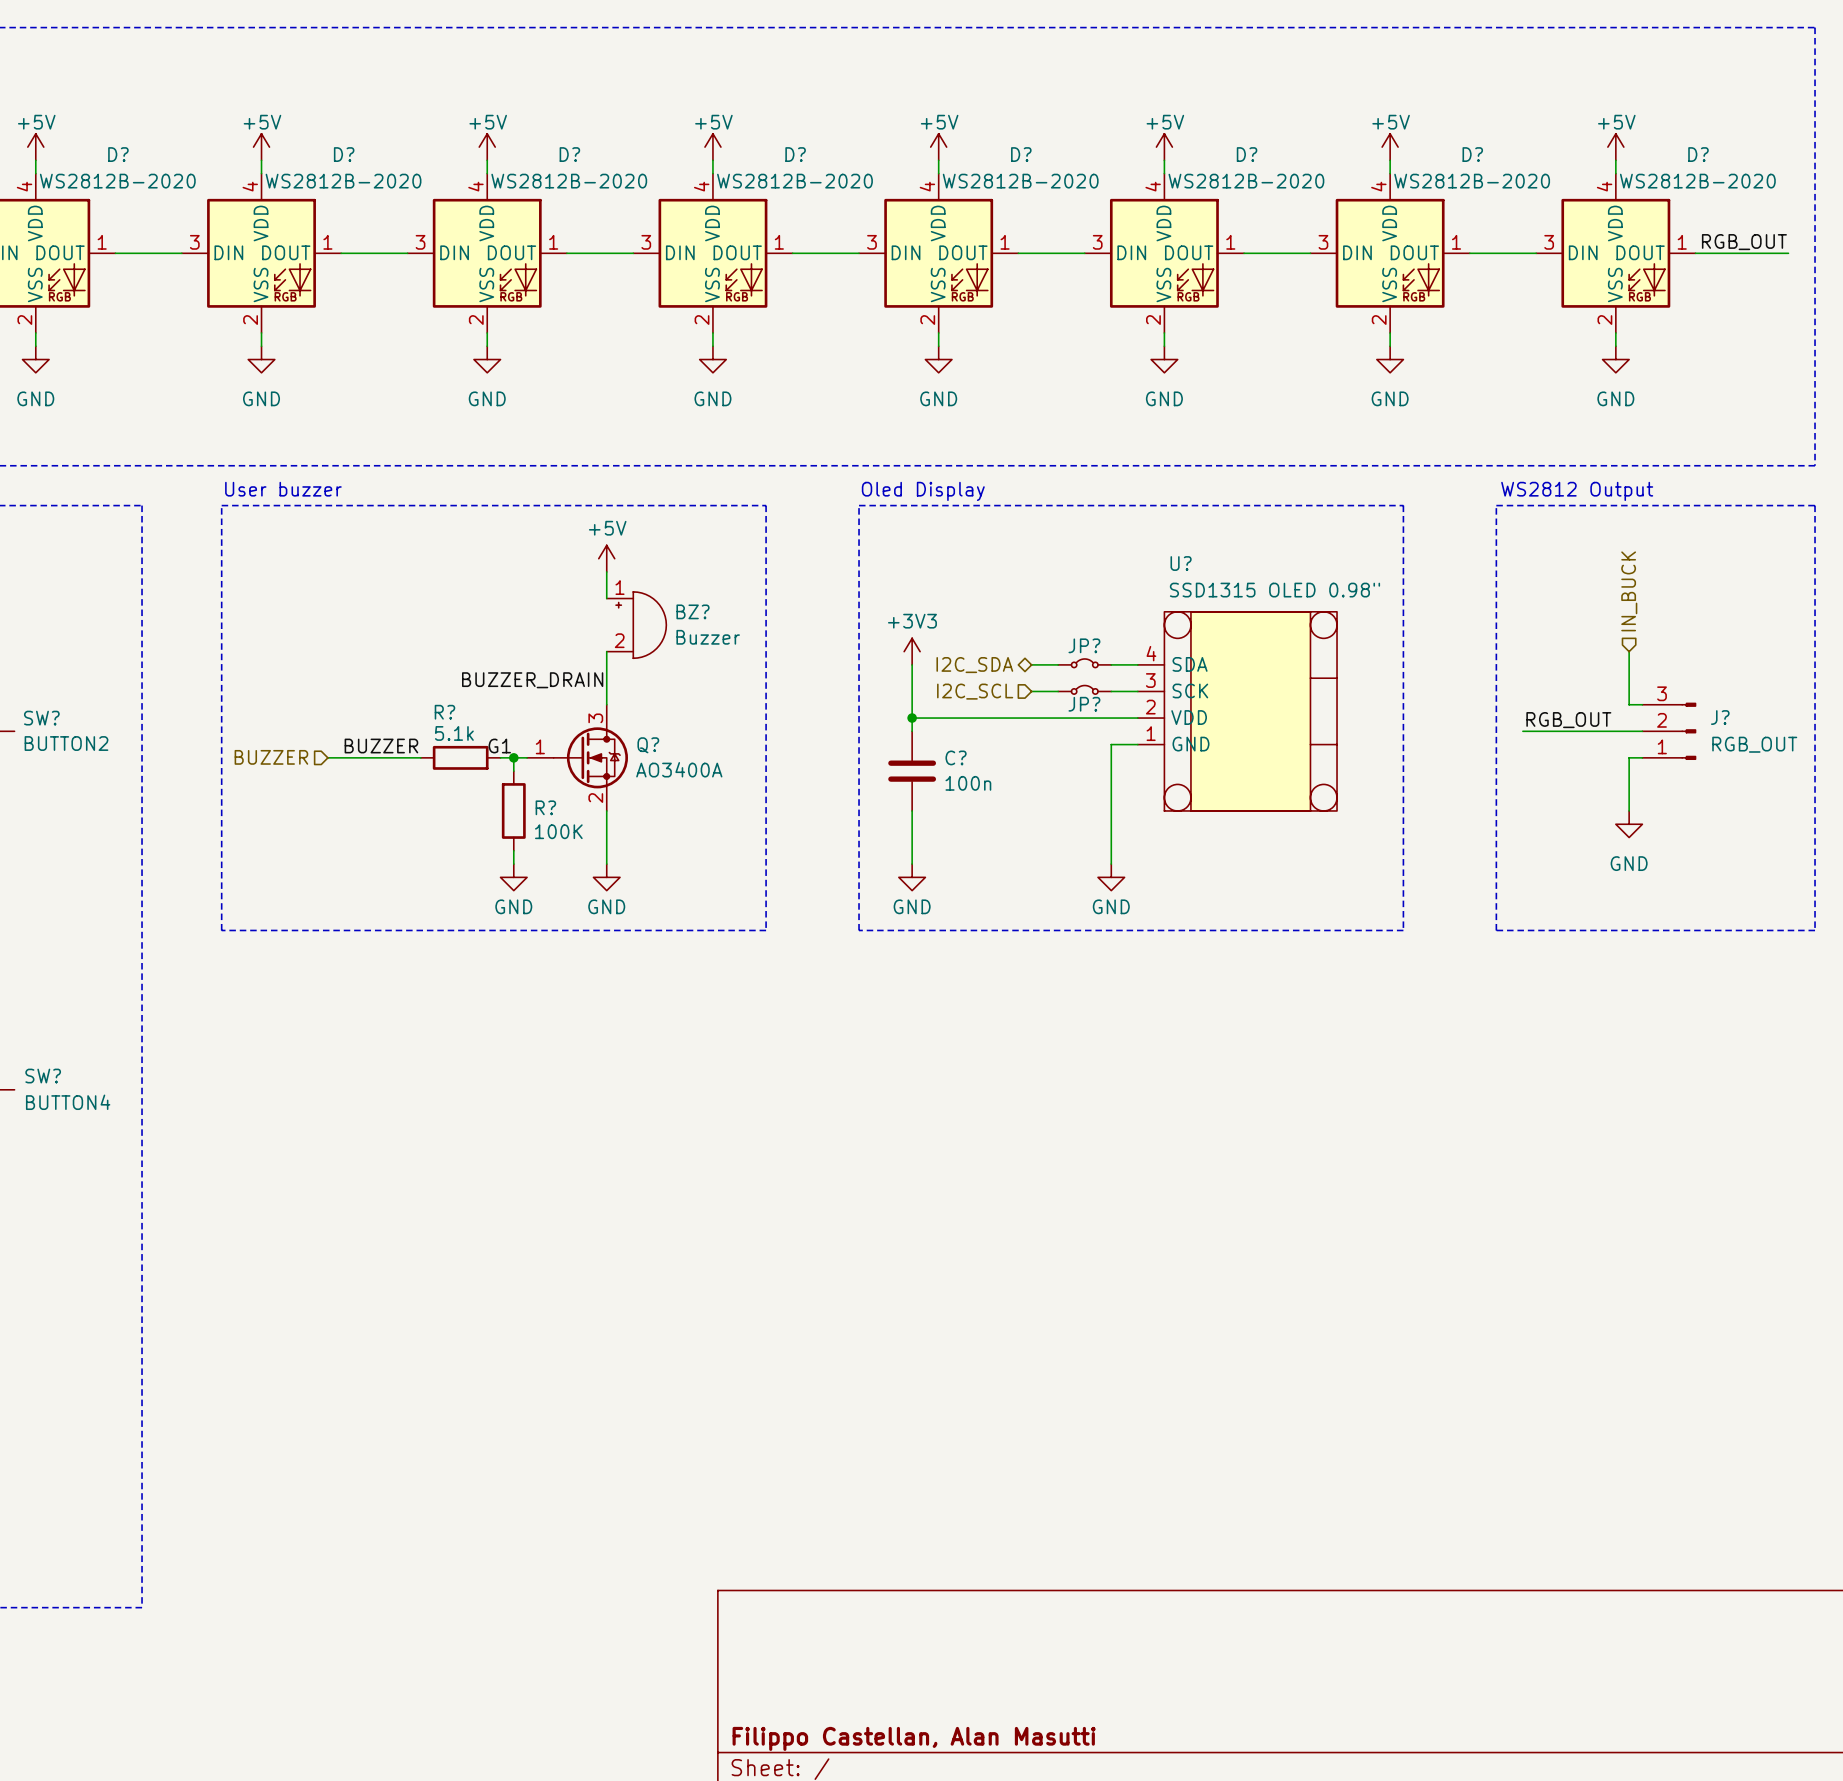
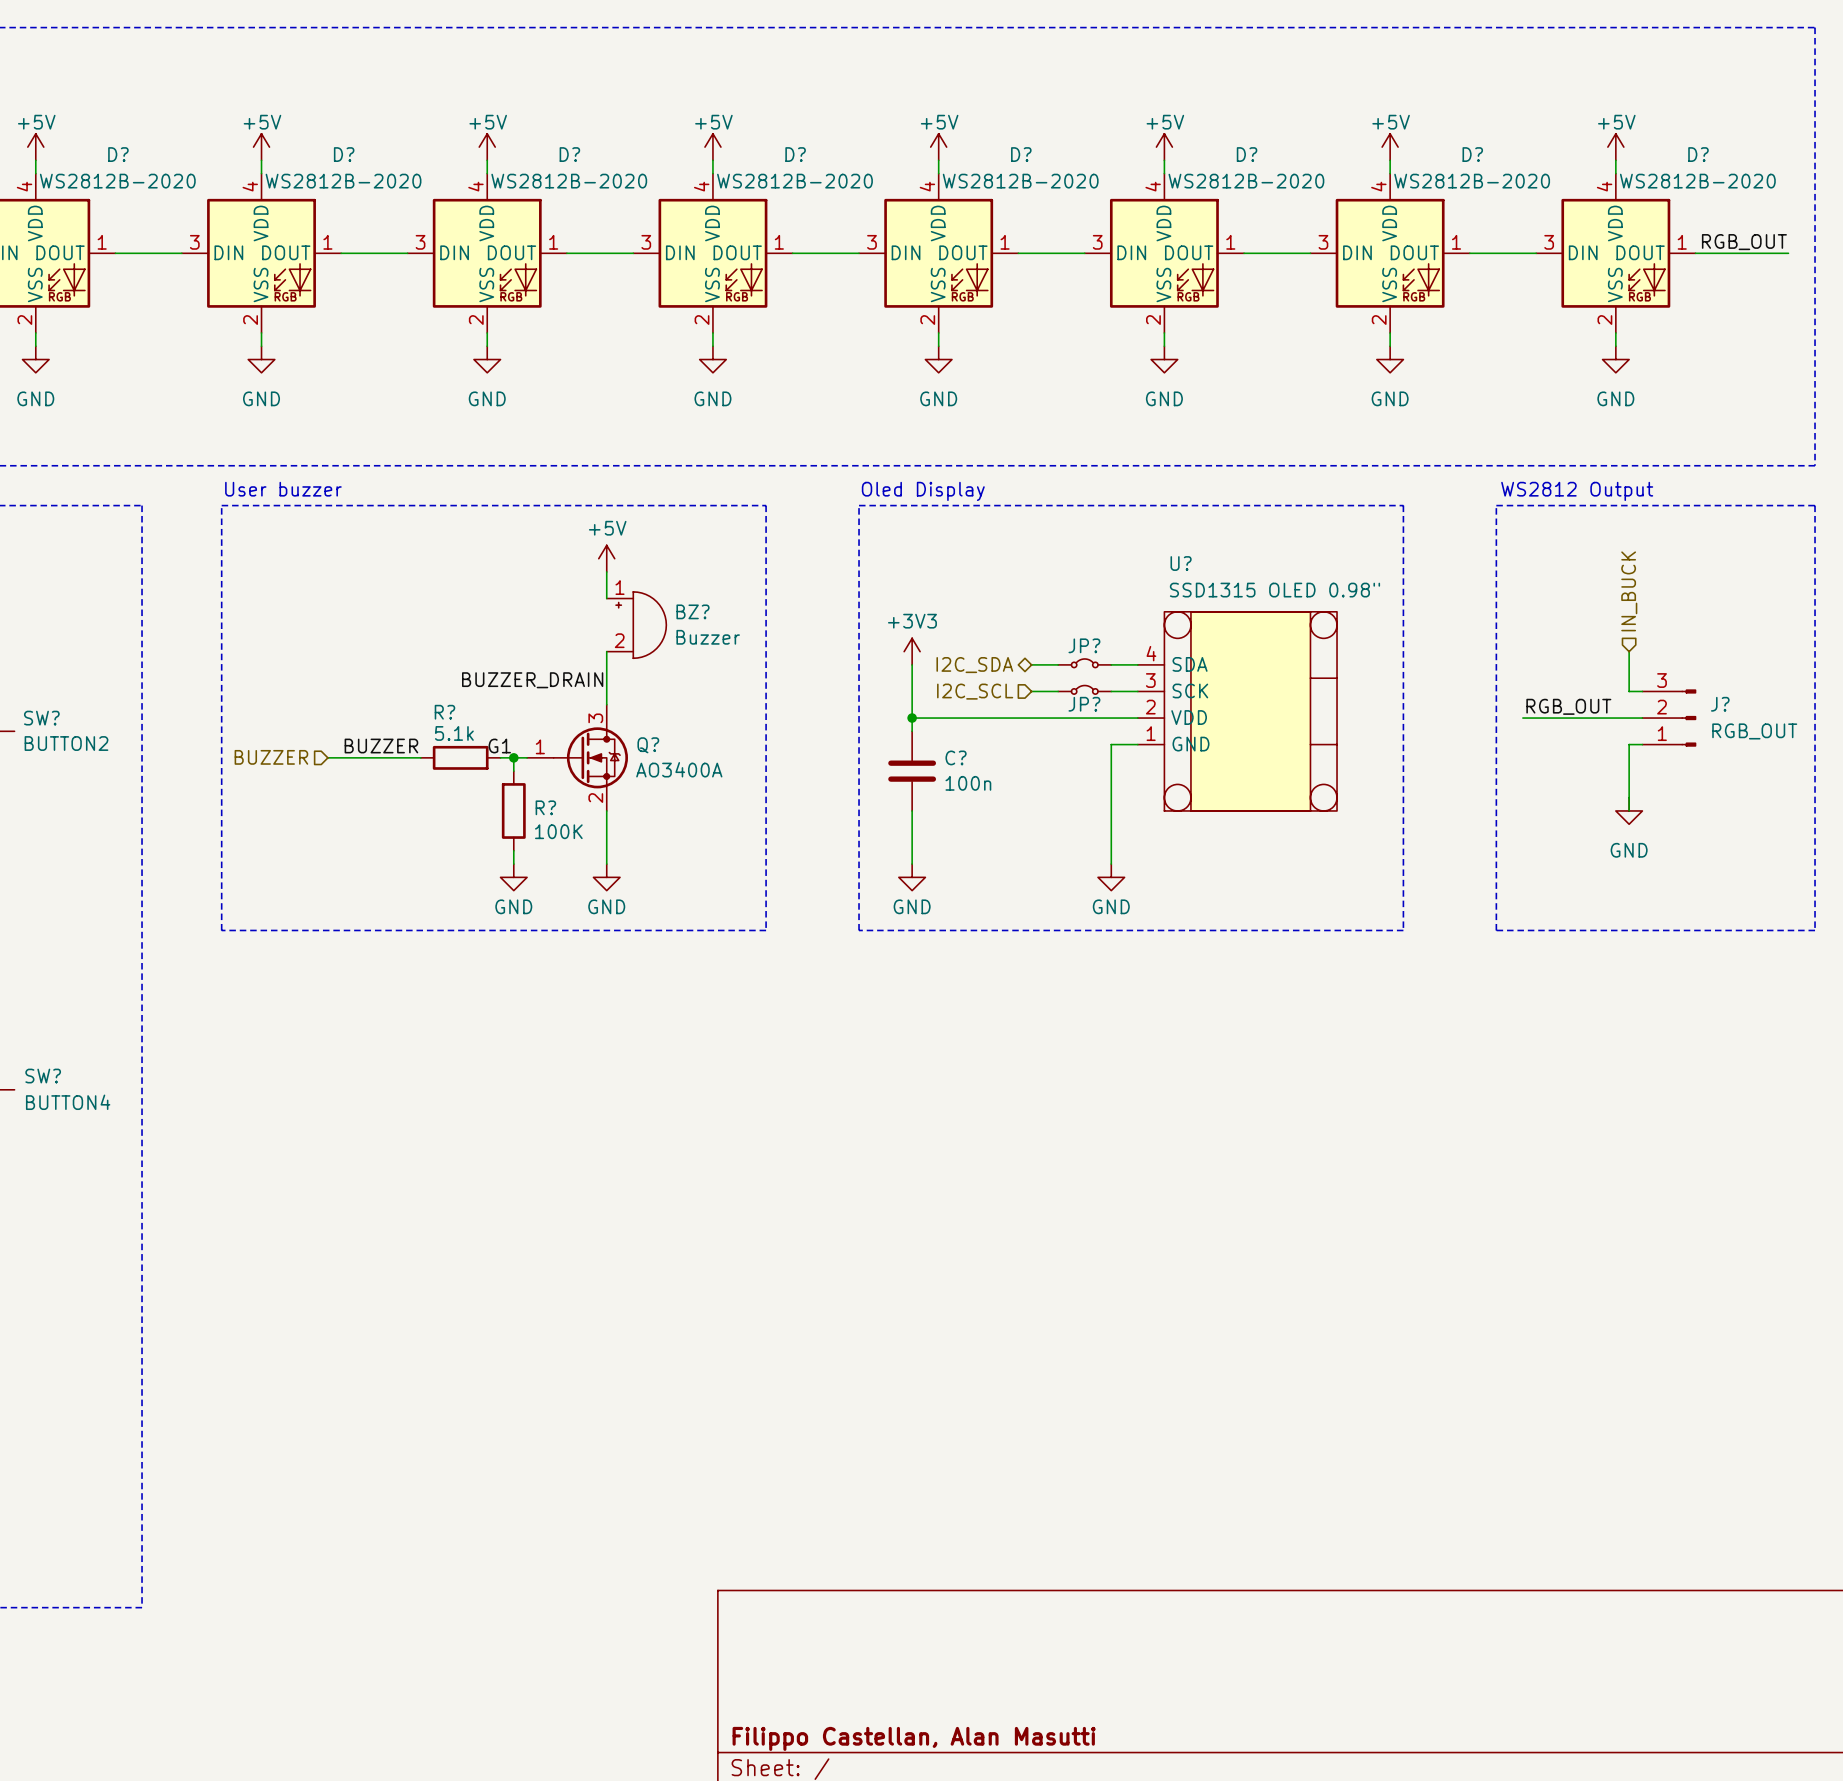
wire: (1629, 691) (1629, 704) (1642, 704) -> (1629, 691) (1642, 691)
label position: RGB_OUT (1568, 720) -> RGB_OUT (1568, 706)
wire: (1522, 731) (1642, 731) -> (1522, 718) (1642, 718)
J? position: (1669, 731) -> (1669, 718)
wire: (1629, 757) (1642, 757) -> (1629, 757) (1629, 744) (1642, 744)
power symbol position: GND (1629, 824) -> GND (1629, 810)

